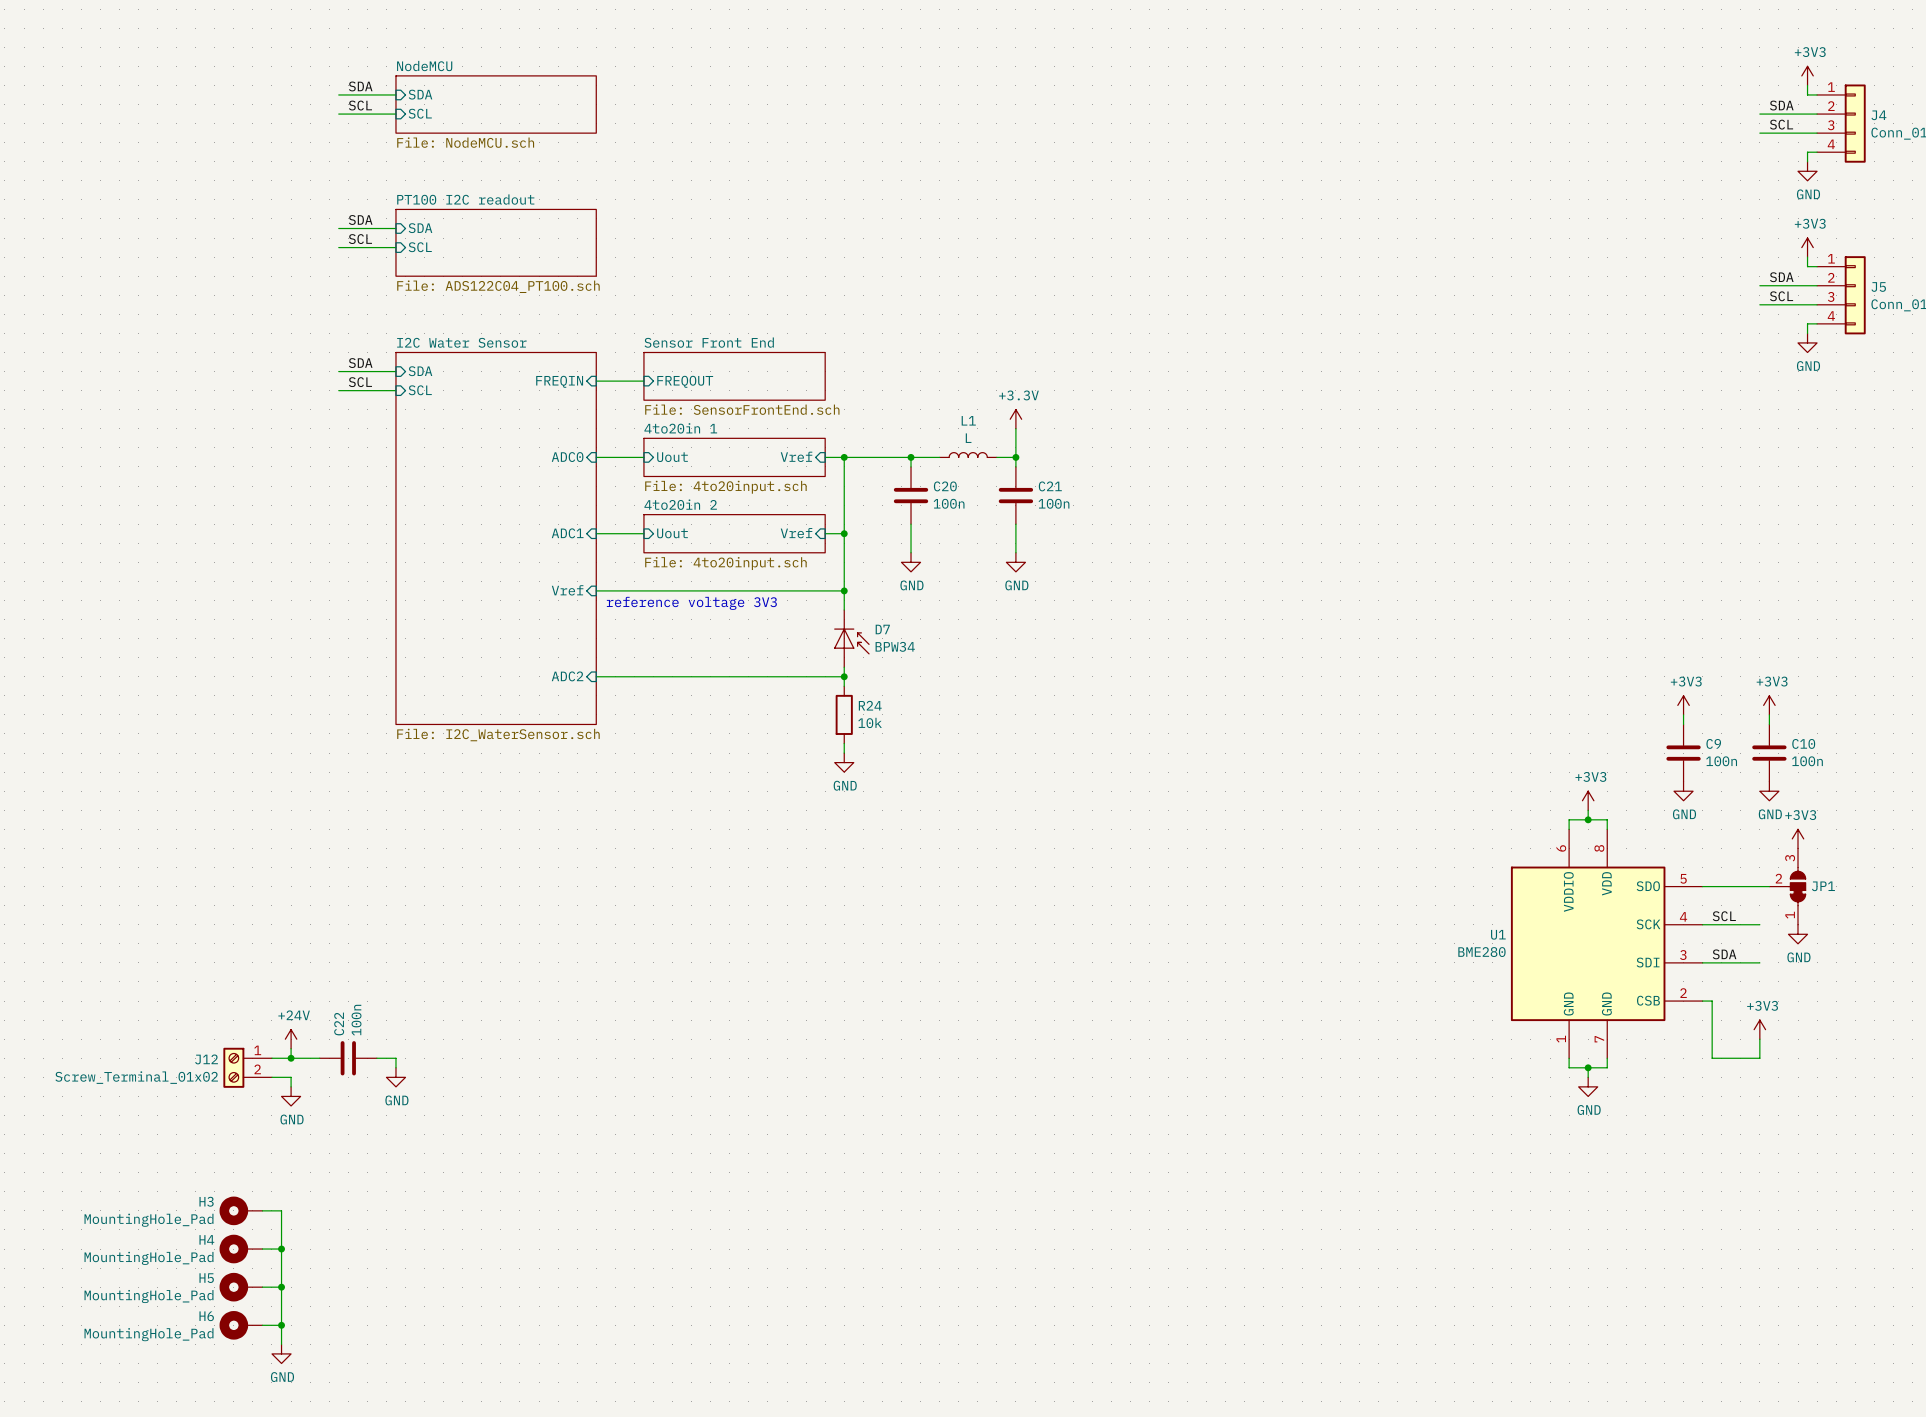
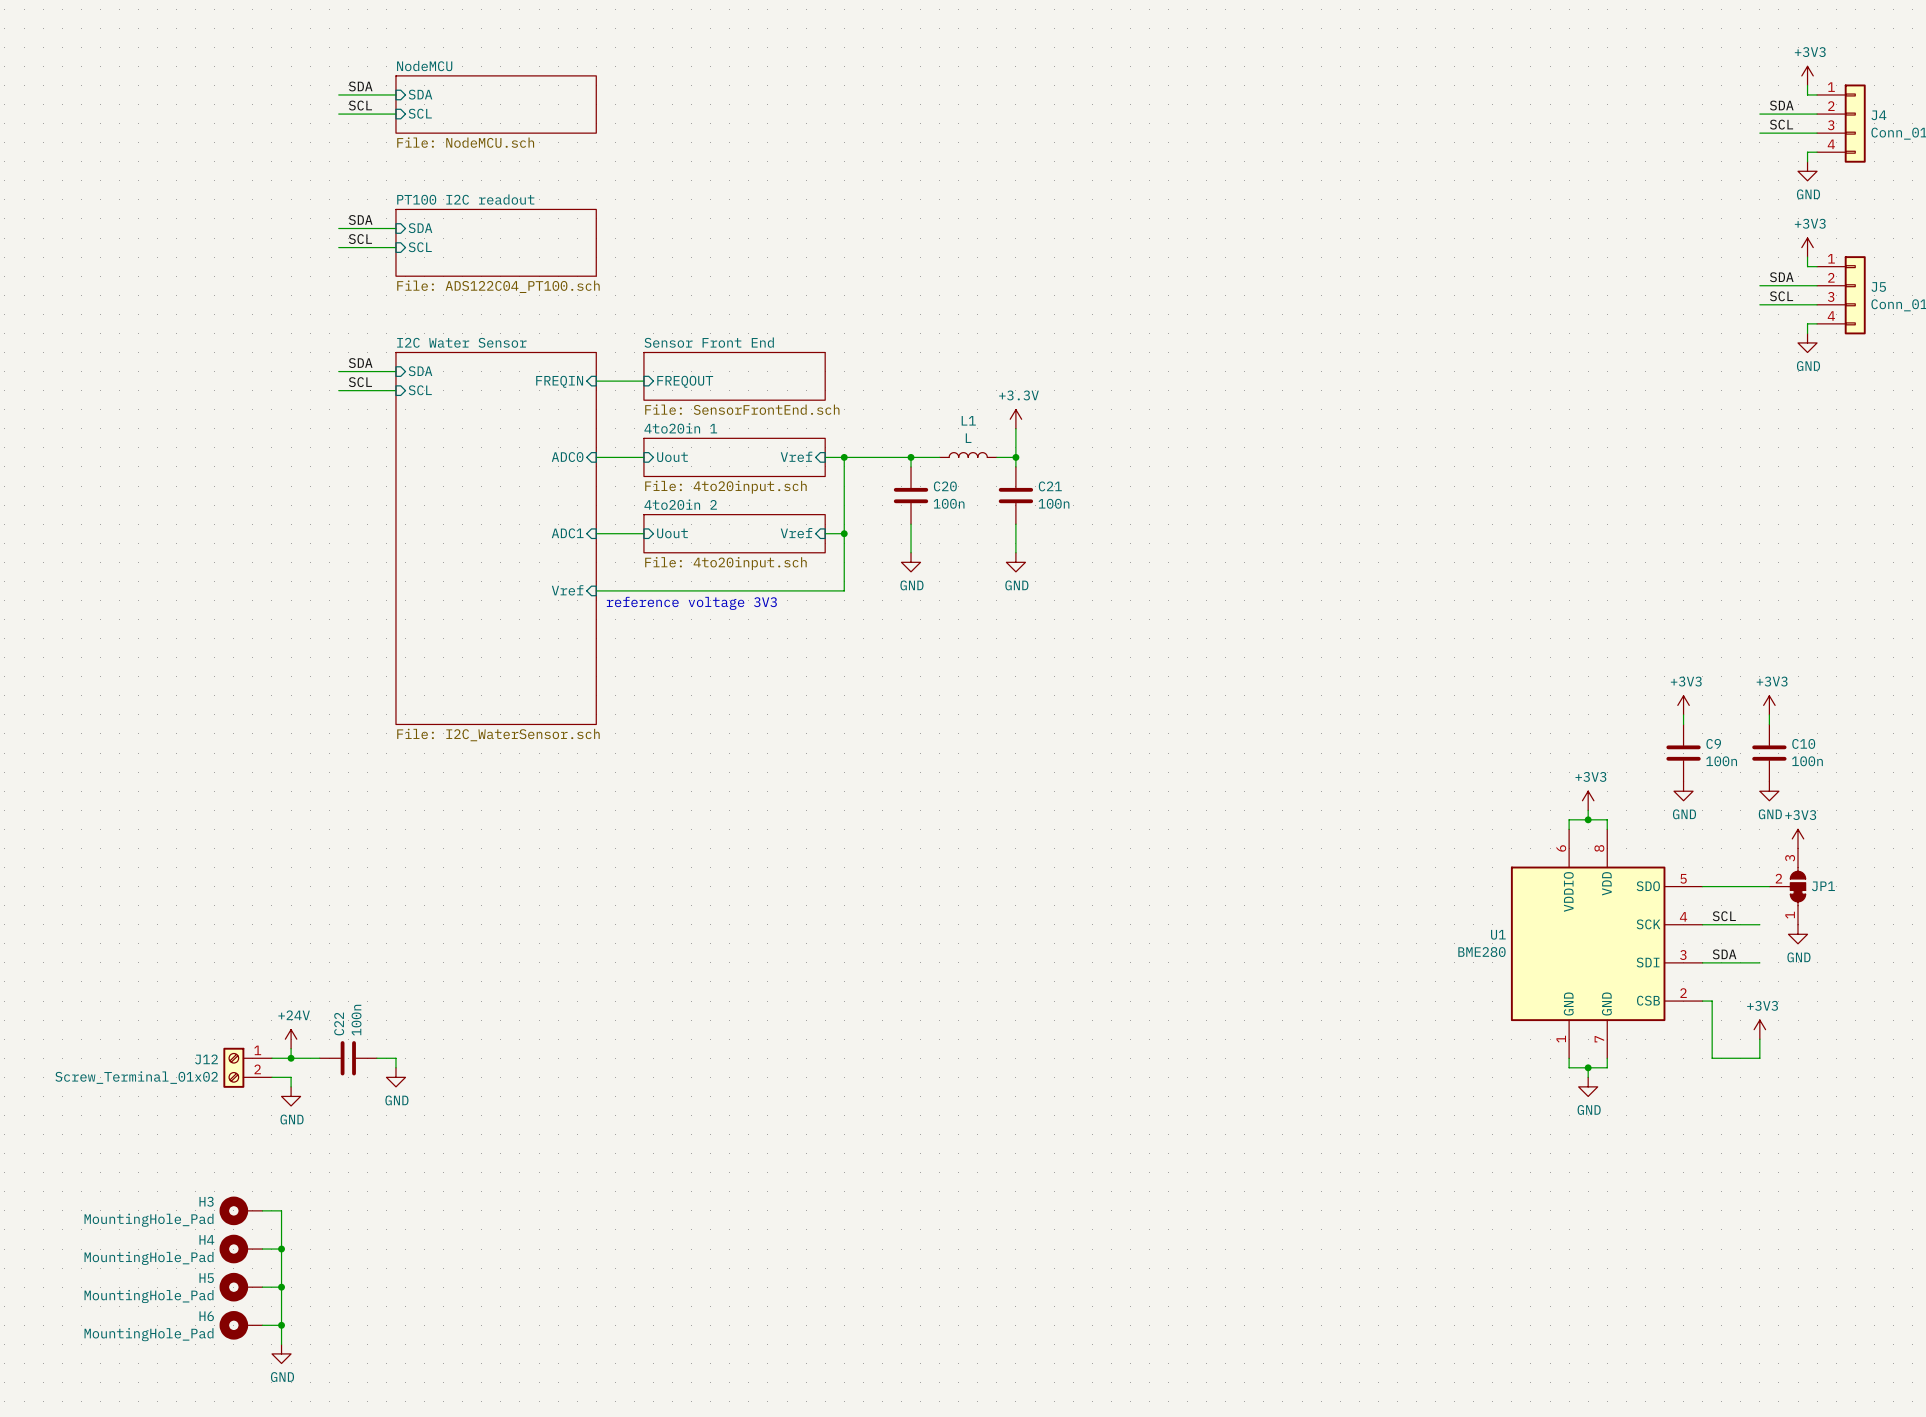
wire: (844, 590) (844, 610) -> none
junction: (844, 590) -> none
D7: BPW34 (851, 638) -> none
wire: (844, 667) (844, 686) -> none
sheet pin: ADC2 (567, 676) -> none
wire: (596, 676) (844, 676) -> none
junction: (844, 676) -> none
R24: 10k (844, 714) -> none
wire: (844, 743) (844, 753) -> none
power symbol: GND (844, 762) -> none

